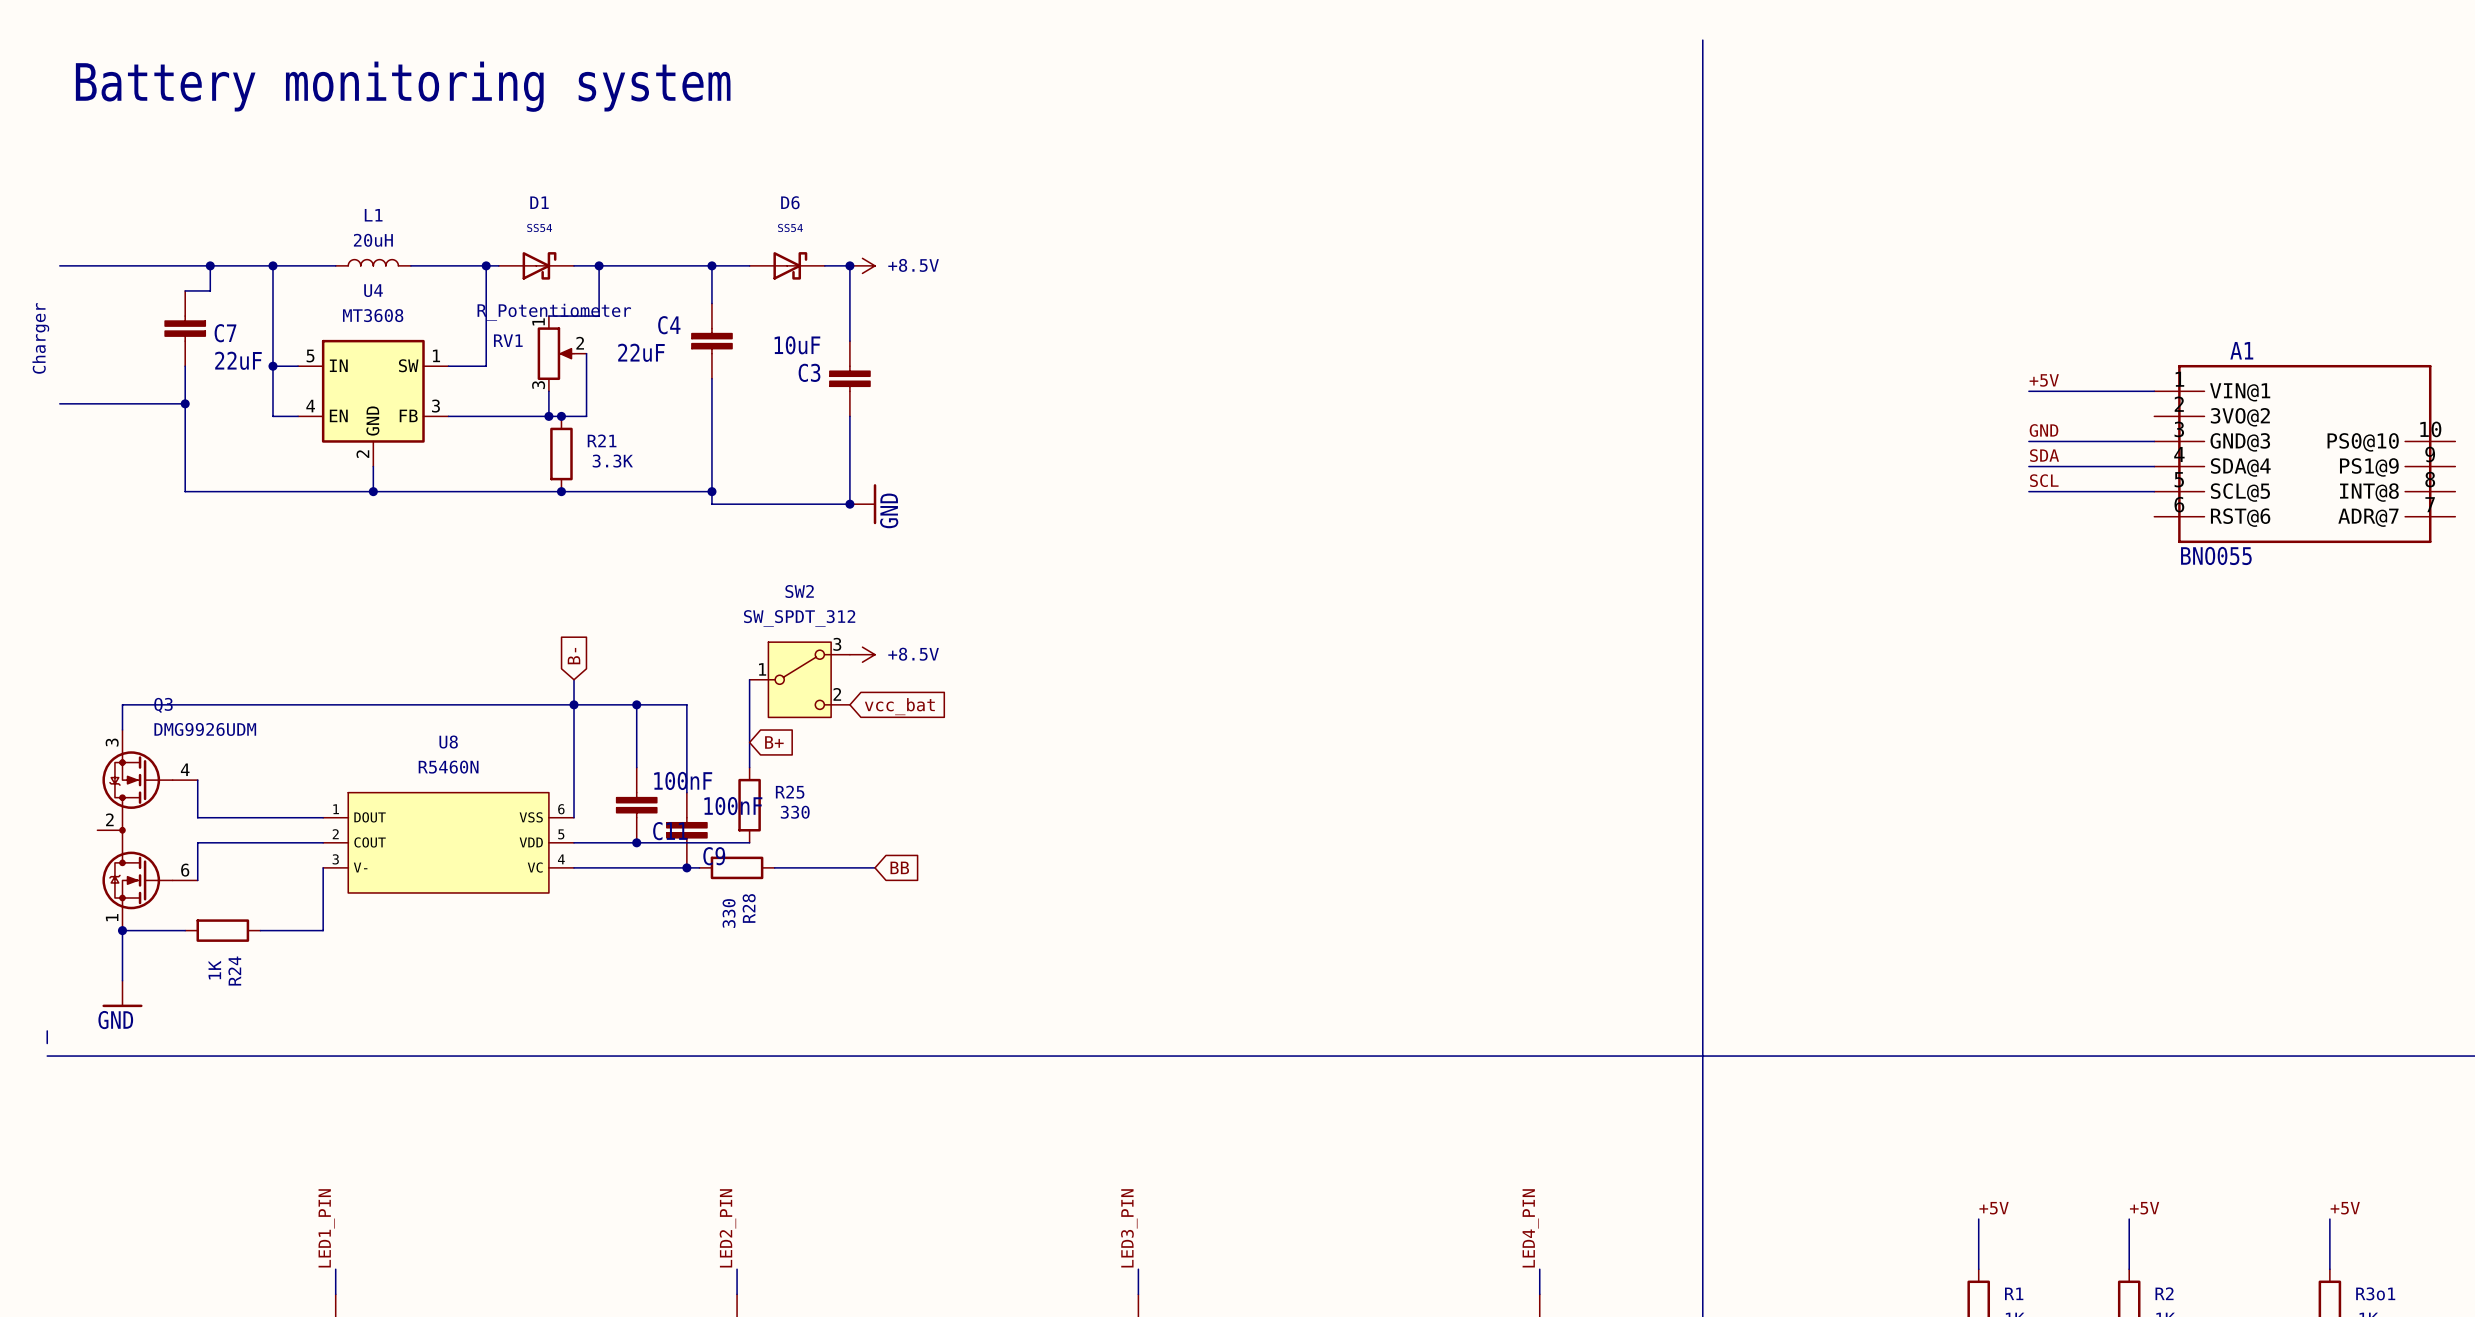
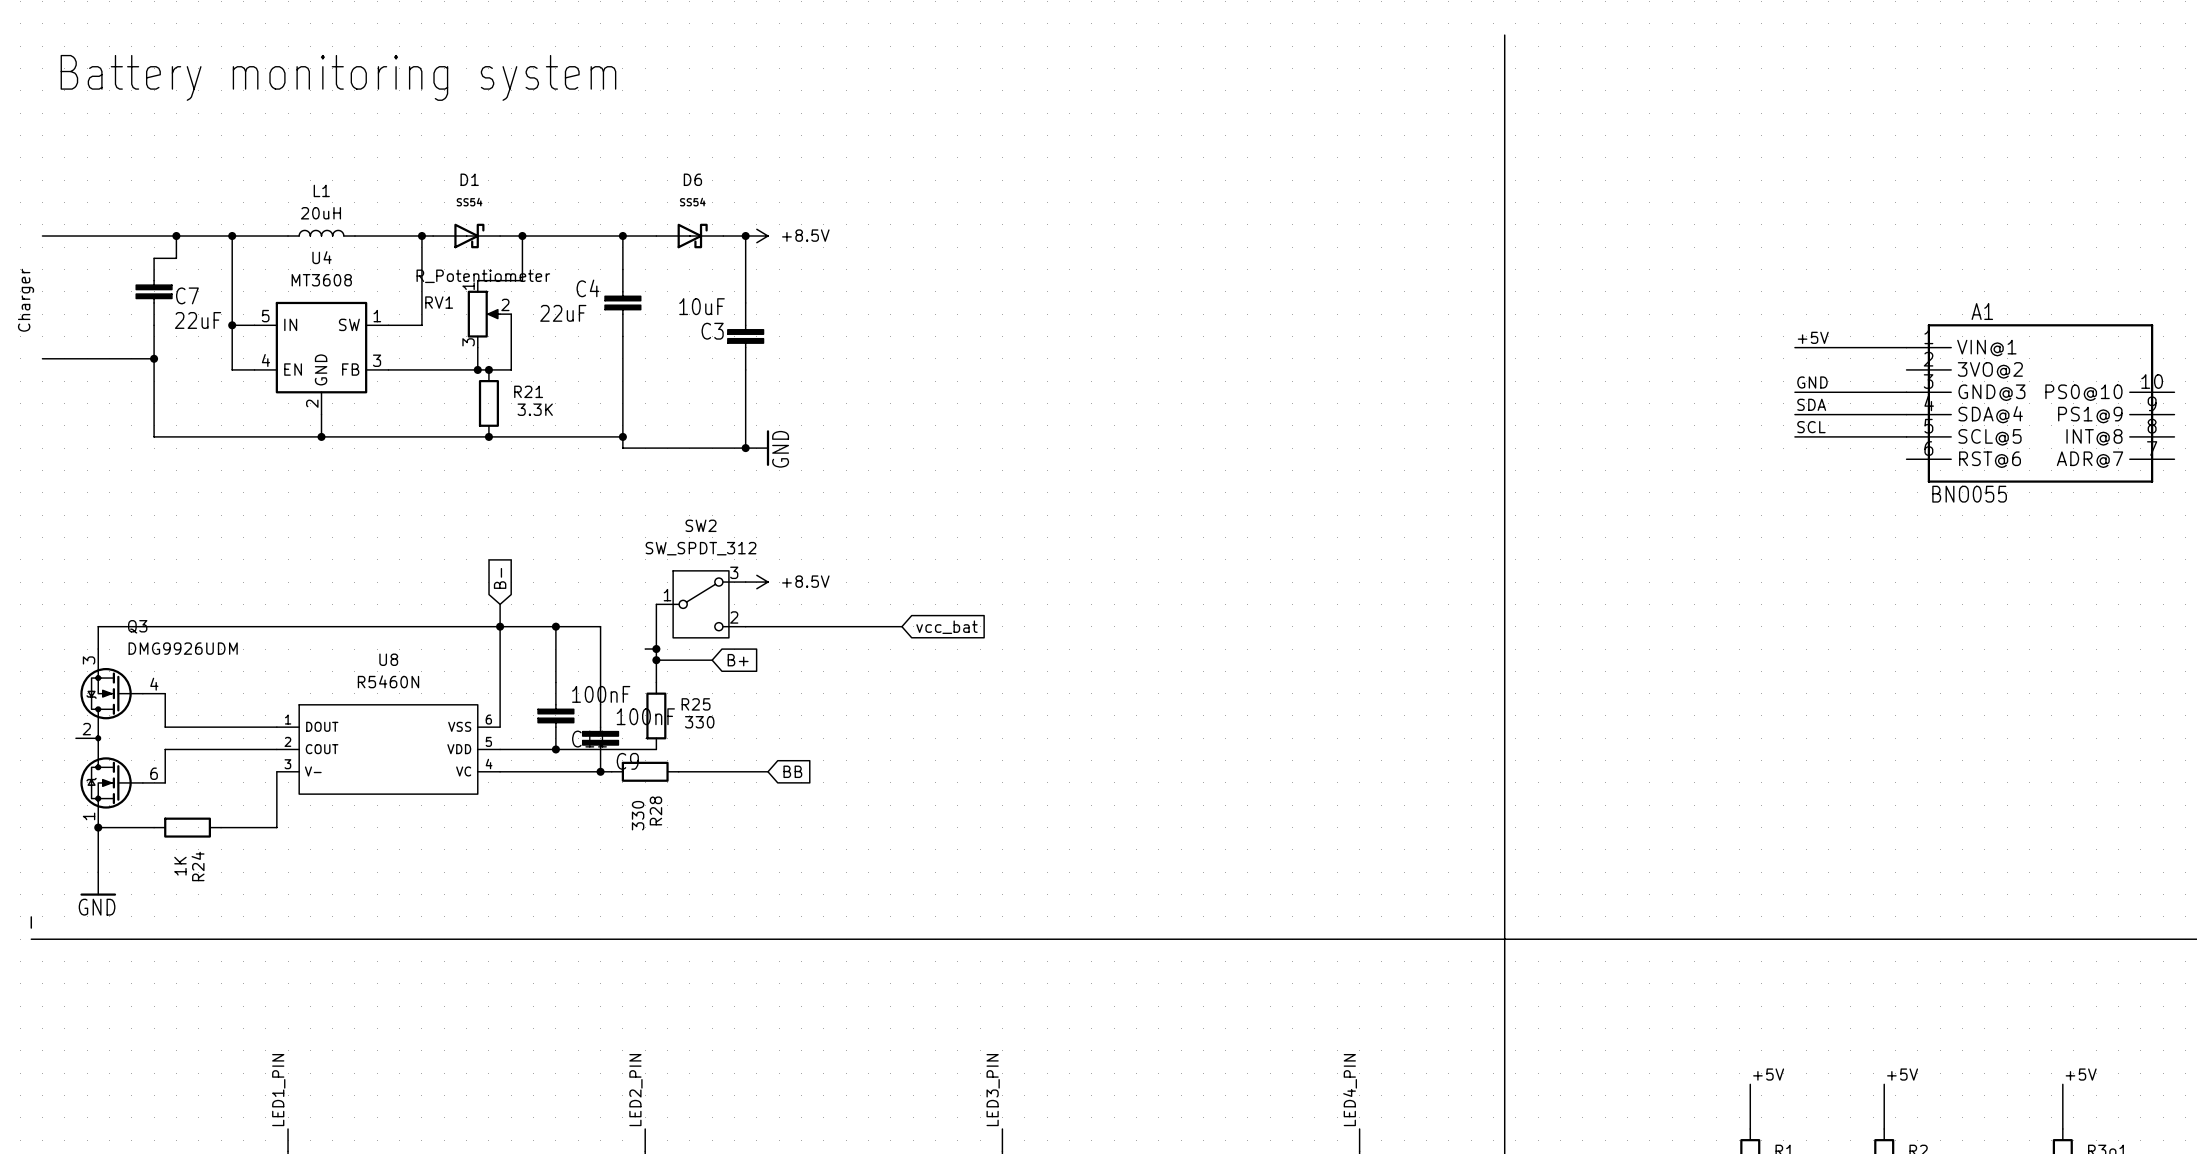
wire: none -> (745, 626) (901, 626)
global label position: vcc_bat (899, 706) -> vcc_bat (947, 627)
wire: none -> (645, 649) (656, 649)
junction: none -> (656, 649)
wire: none -> (656, 660) (712, 660)
junction: none -> (656, 660)
global label position: B+ (774, 742) -> B+ (738, 660)

